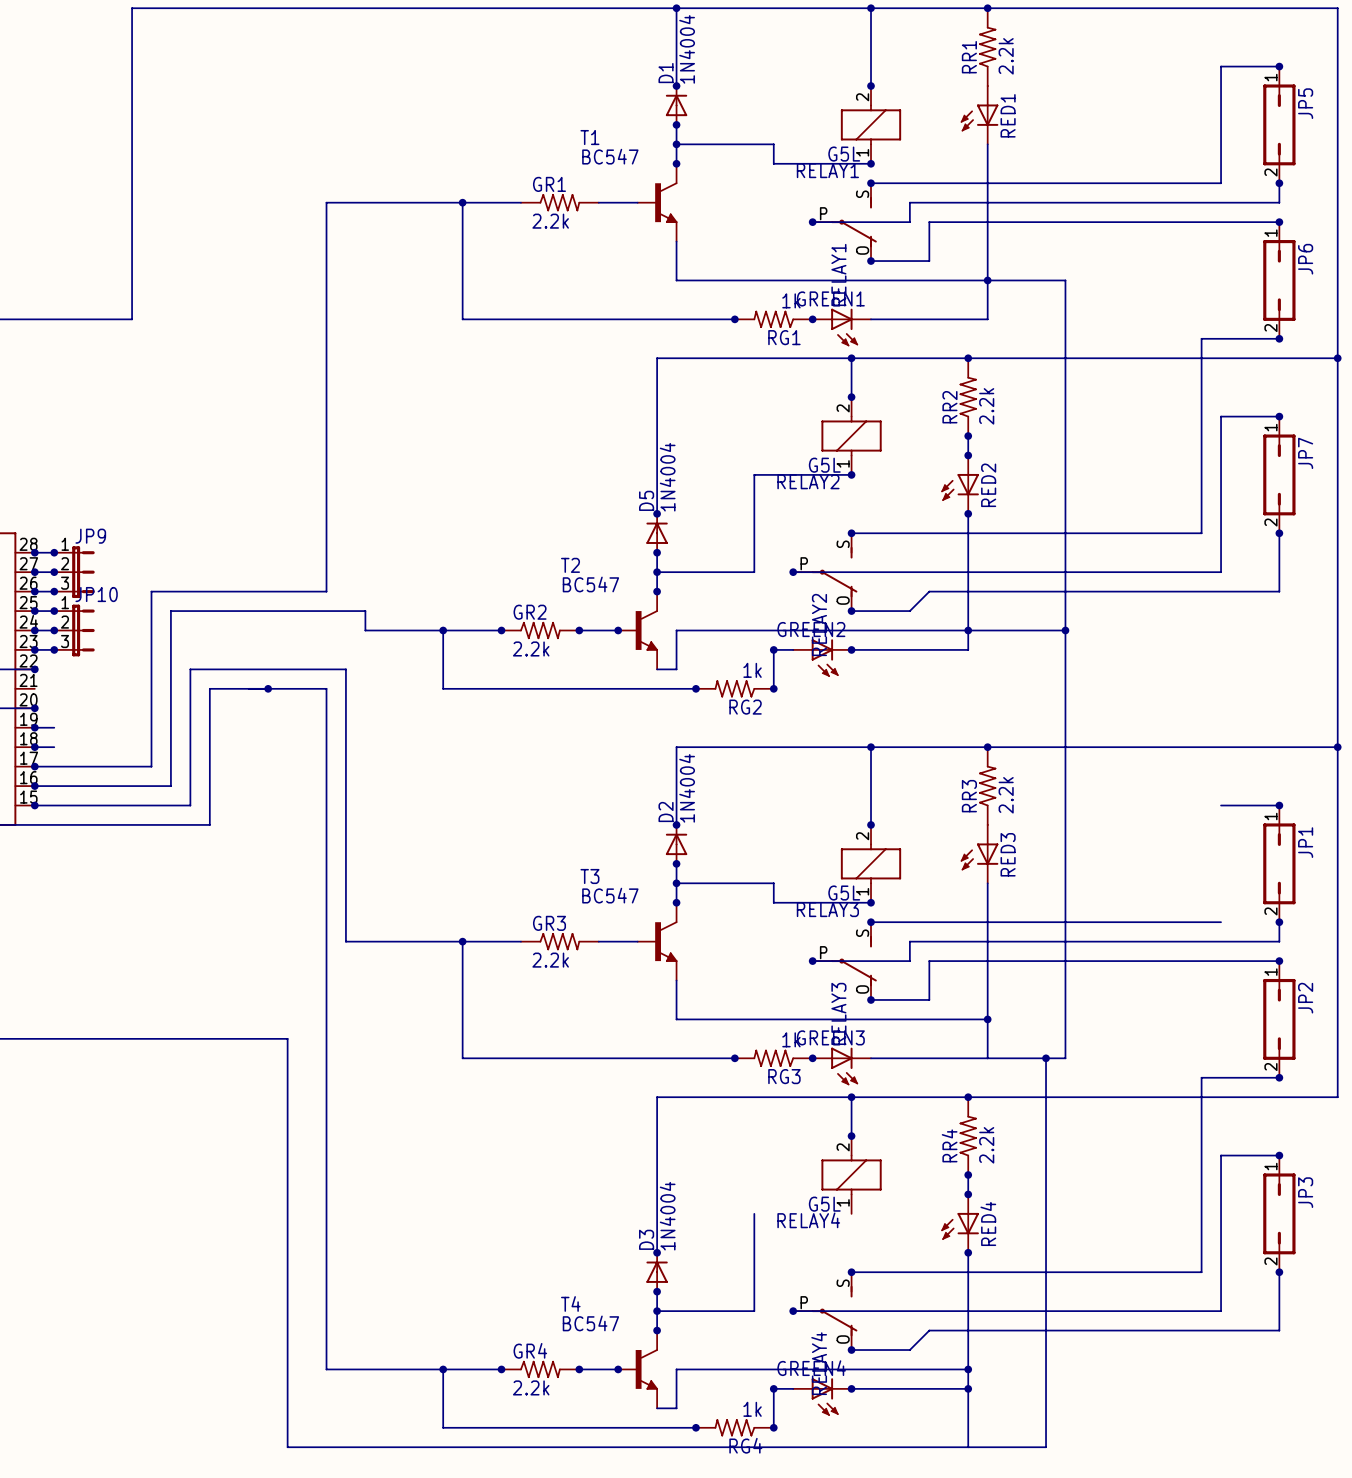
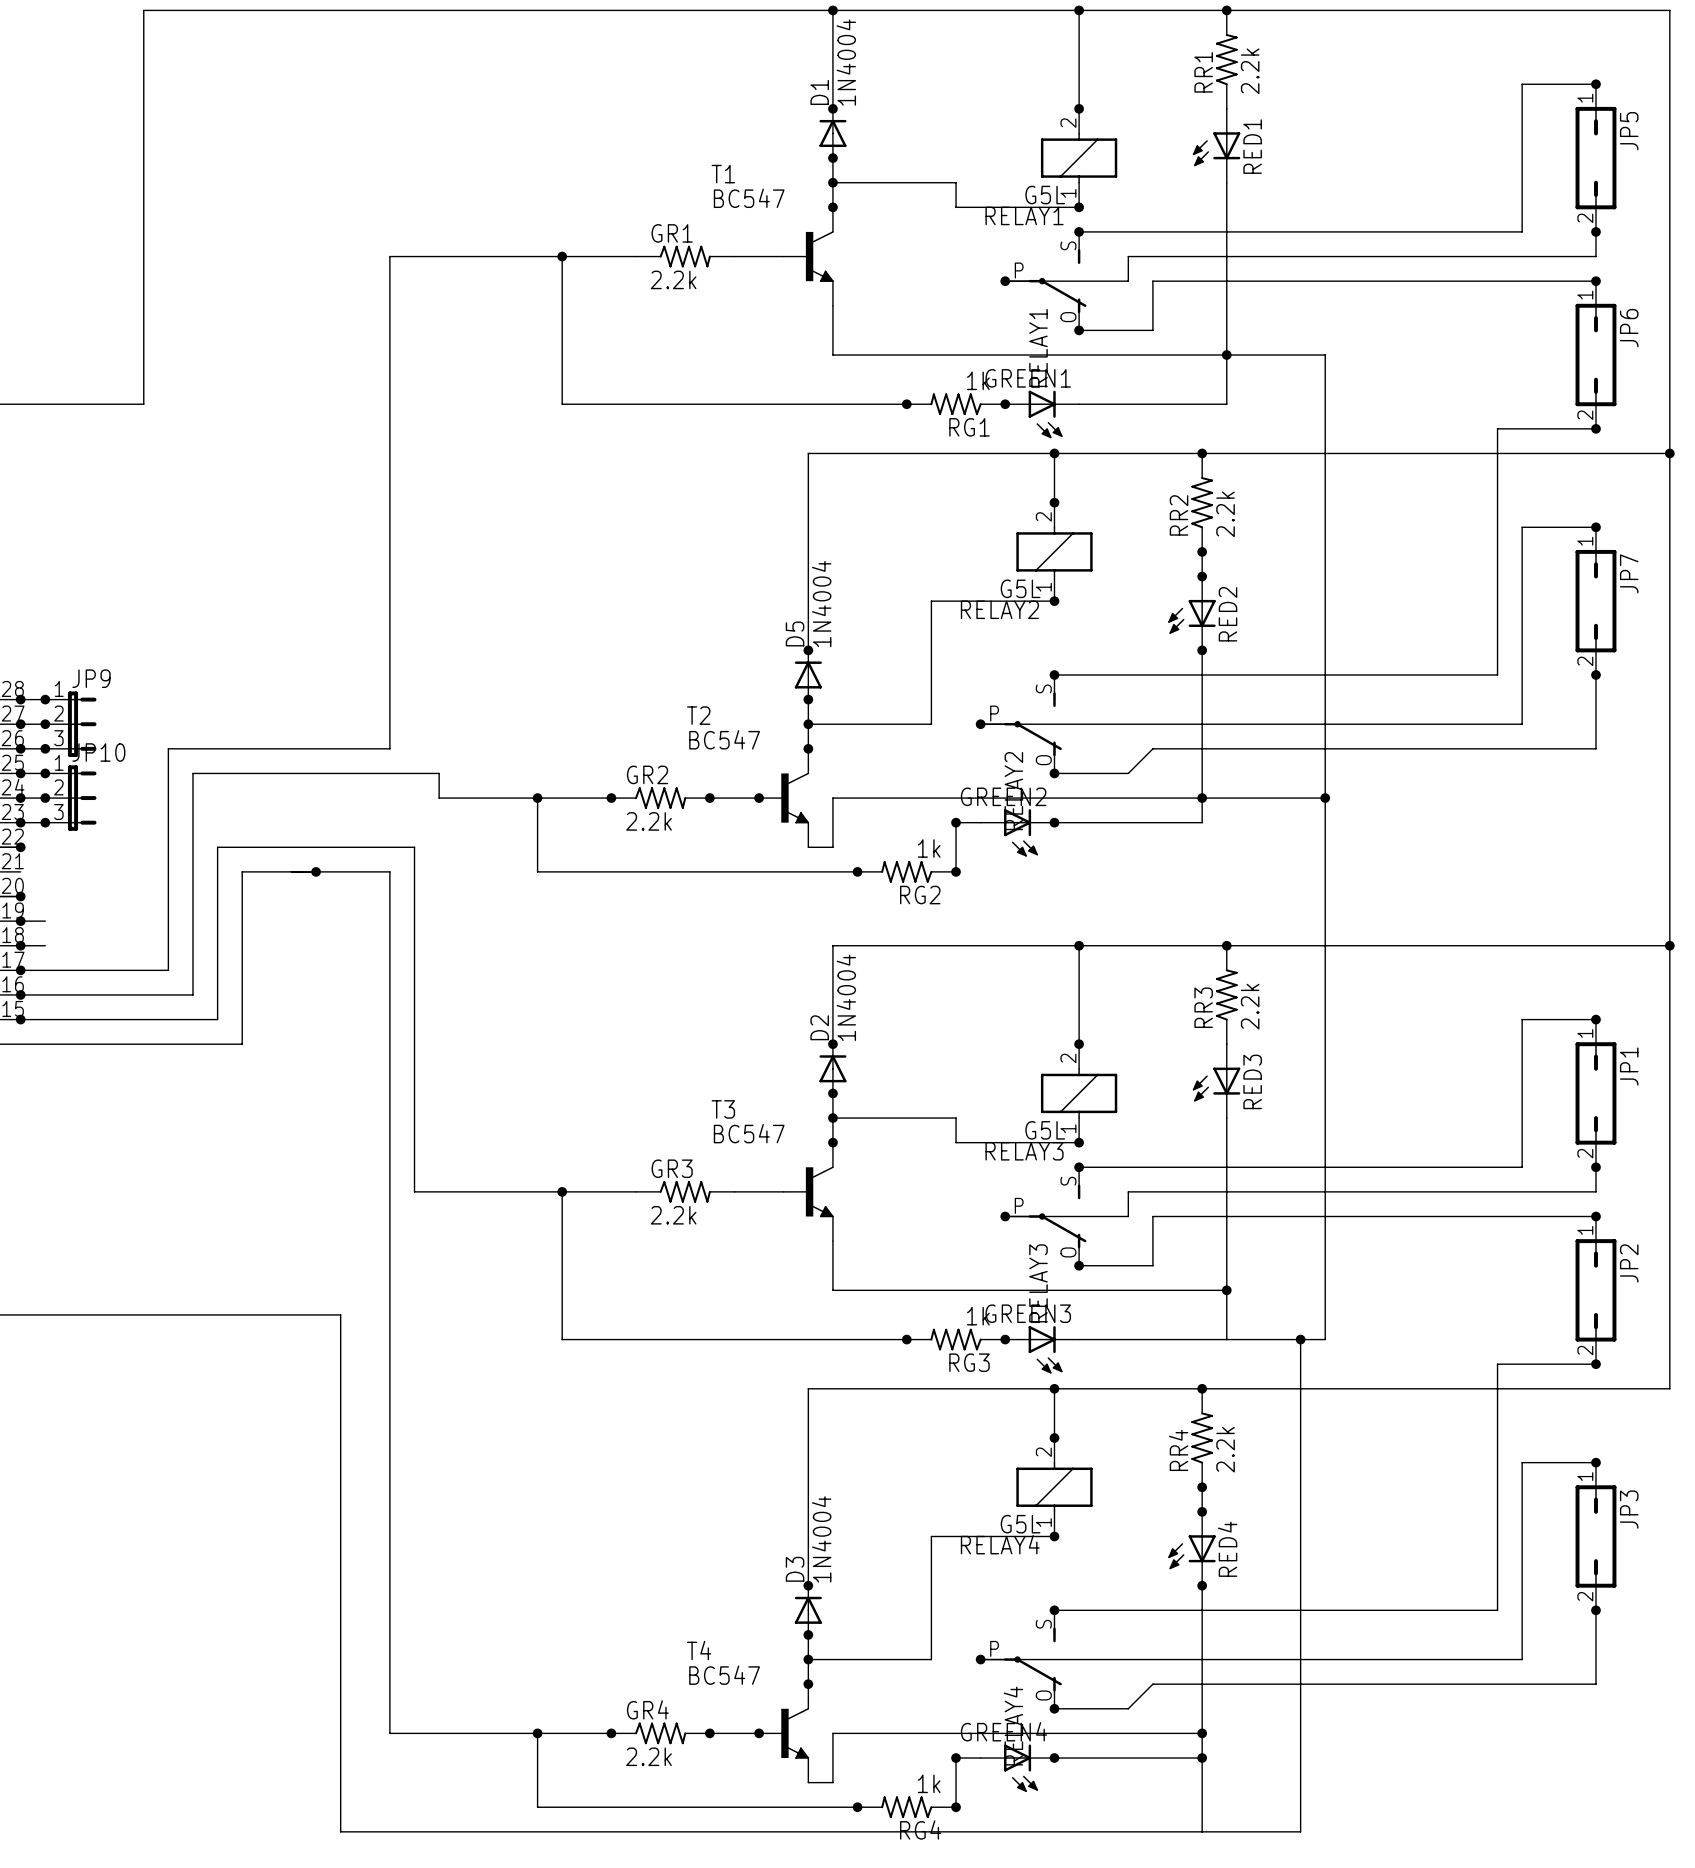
wire: none -> (1522, 1019) (1522, 1167)
wire: none -> (931, 1536) (1054, 1536)
junction: none -> (1054, 1536)

